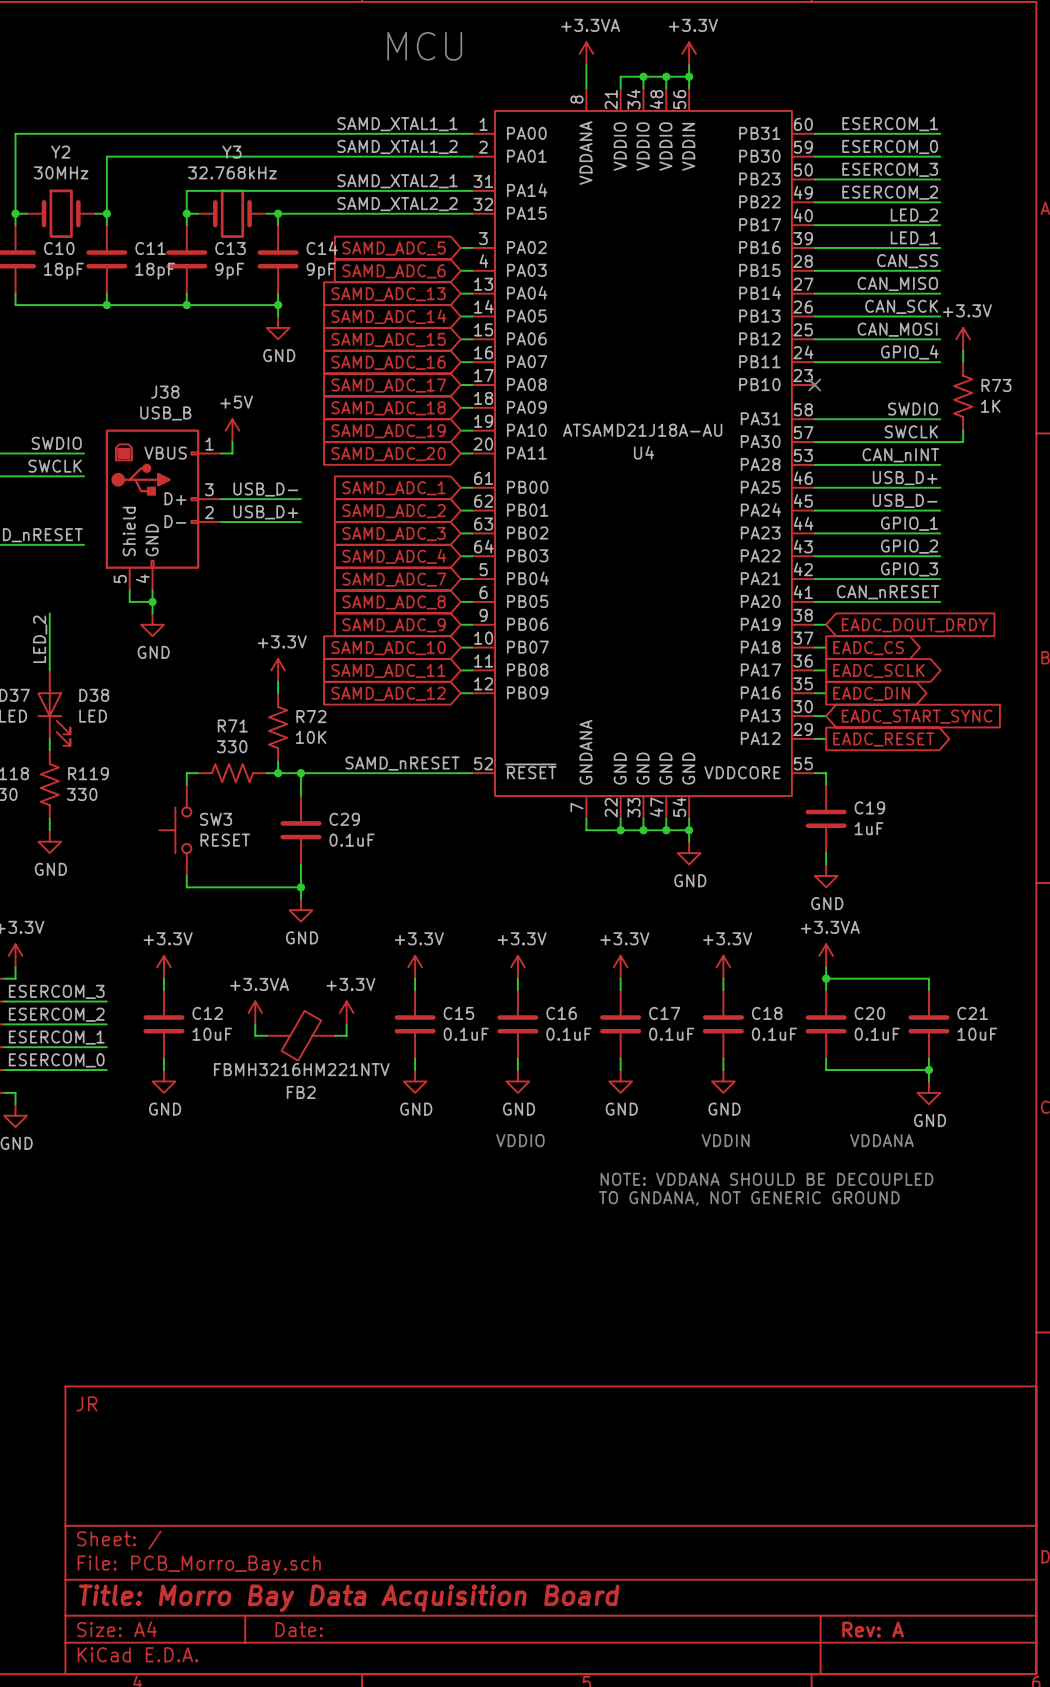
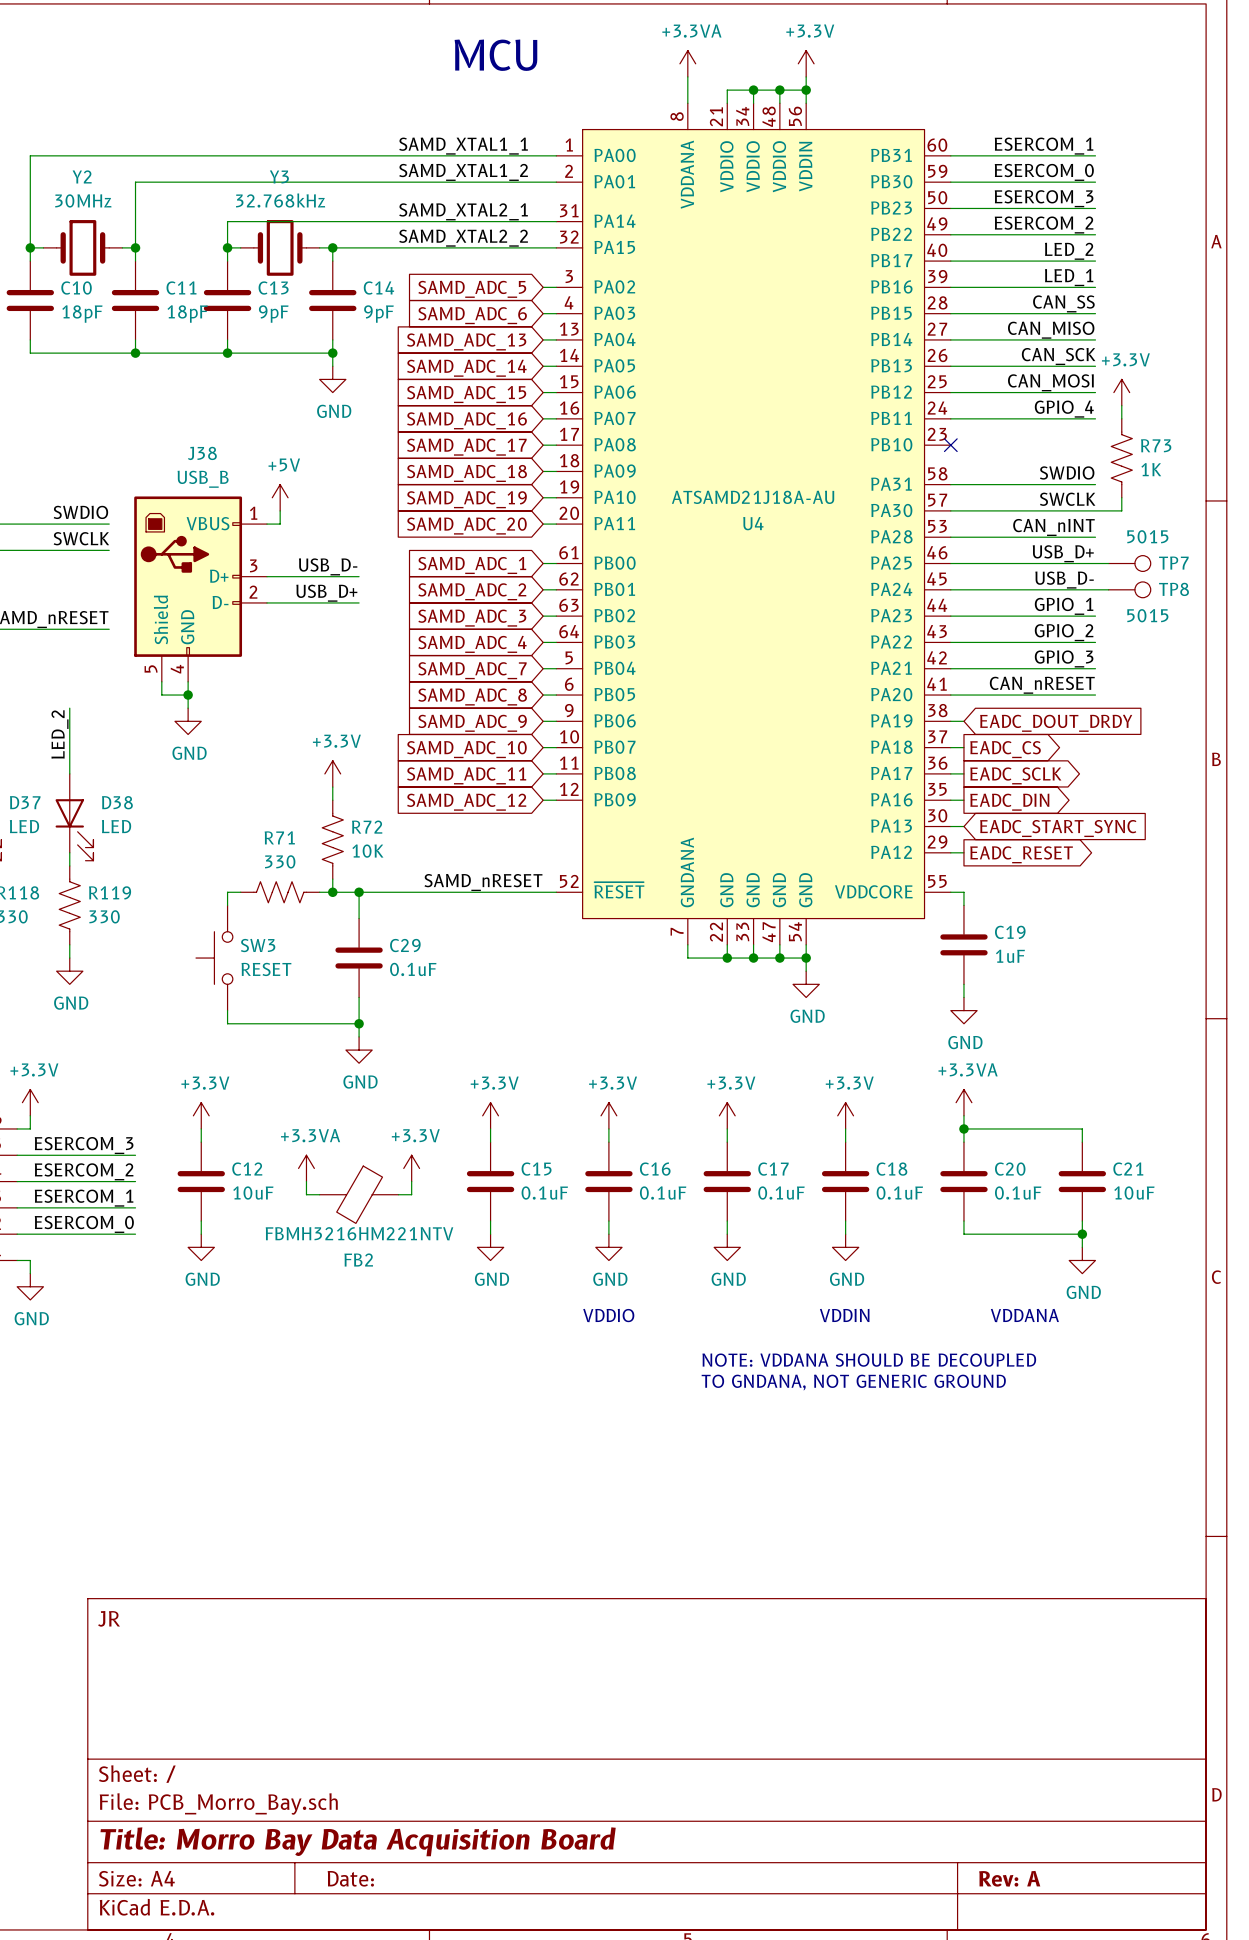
wire: none -> (1095, 563) (1108, 563)
TP7: none -> 5015 (1129, 563)
wire: none -> (1095, 589) (1108, 589)
TP8: none -> 5015 (1129, 589)

